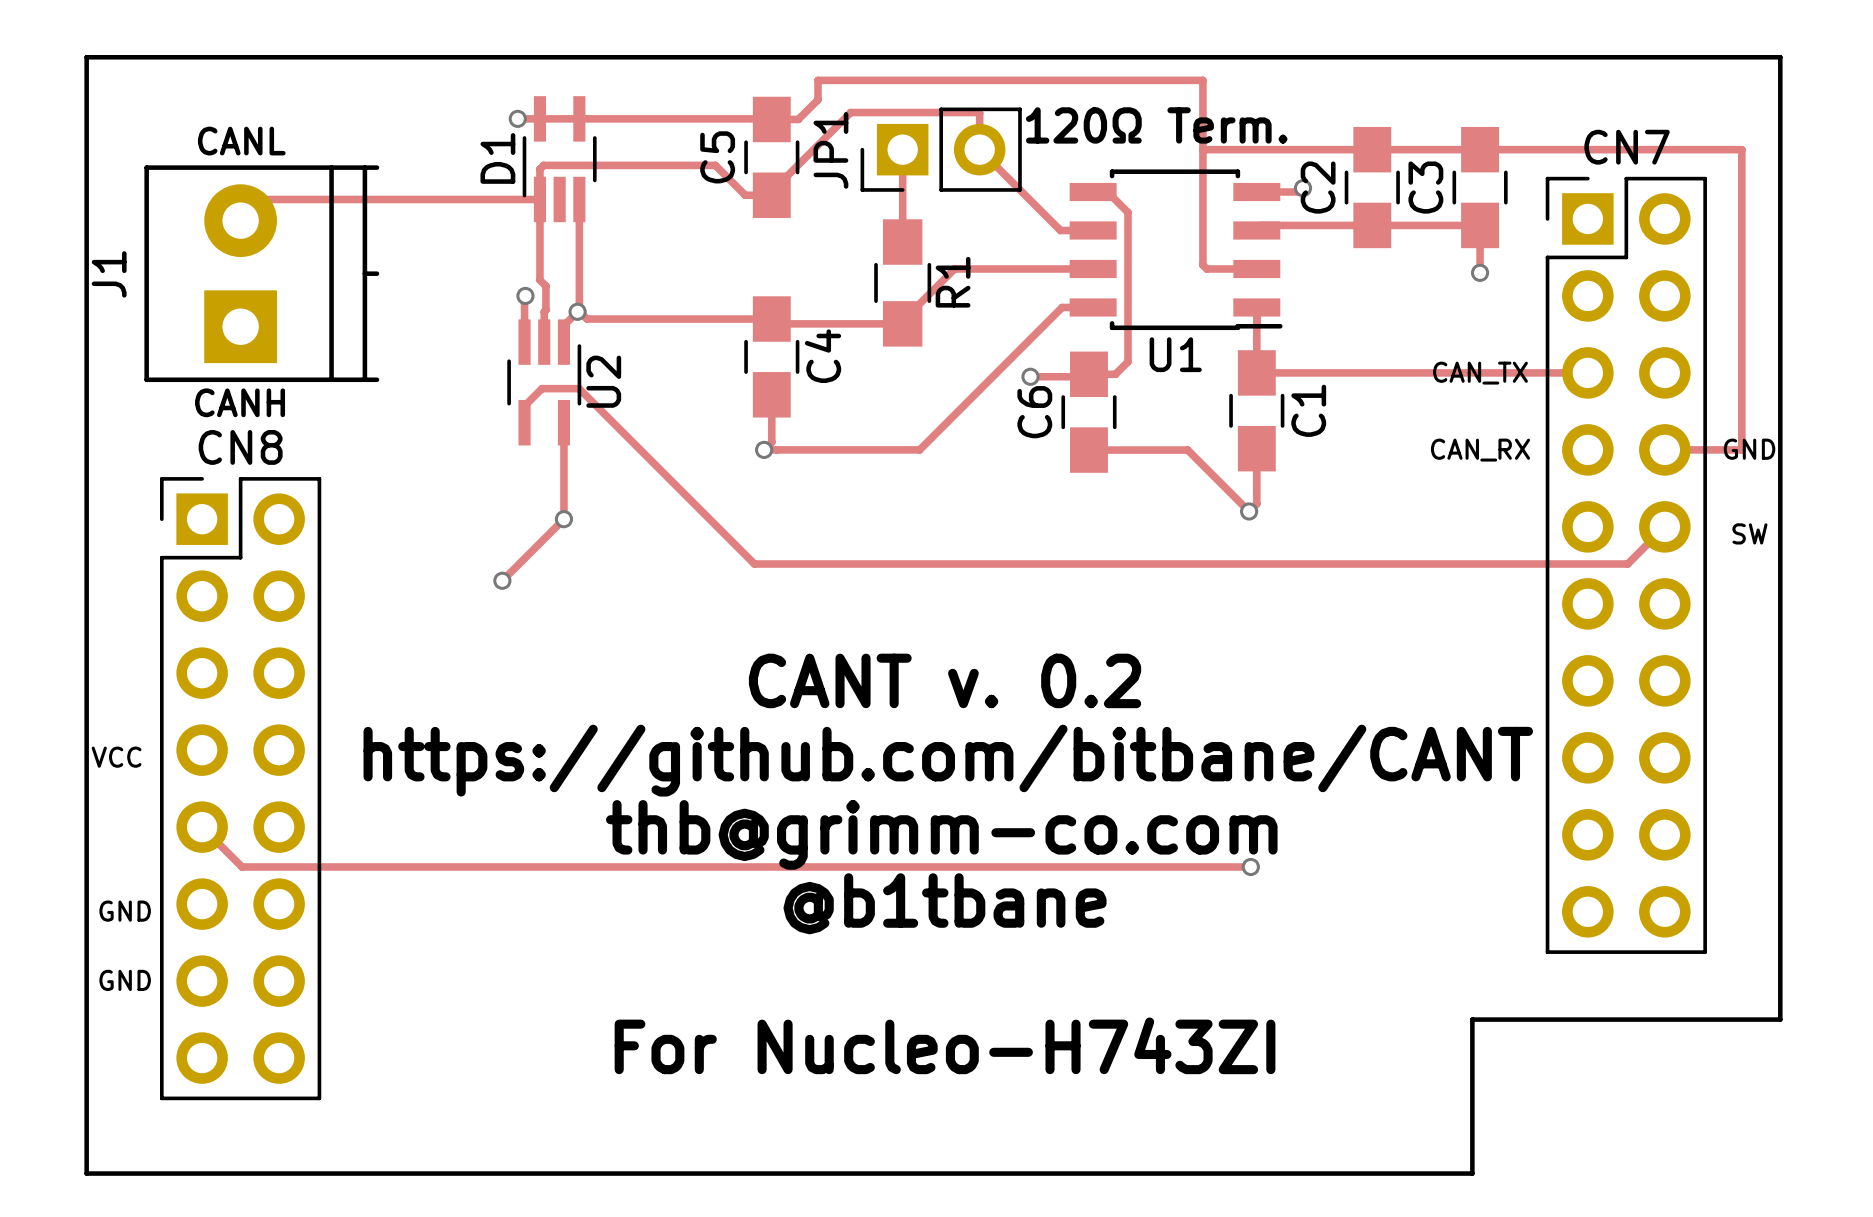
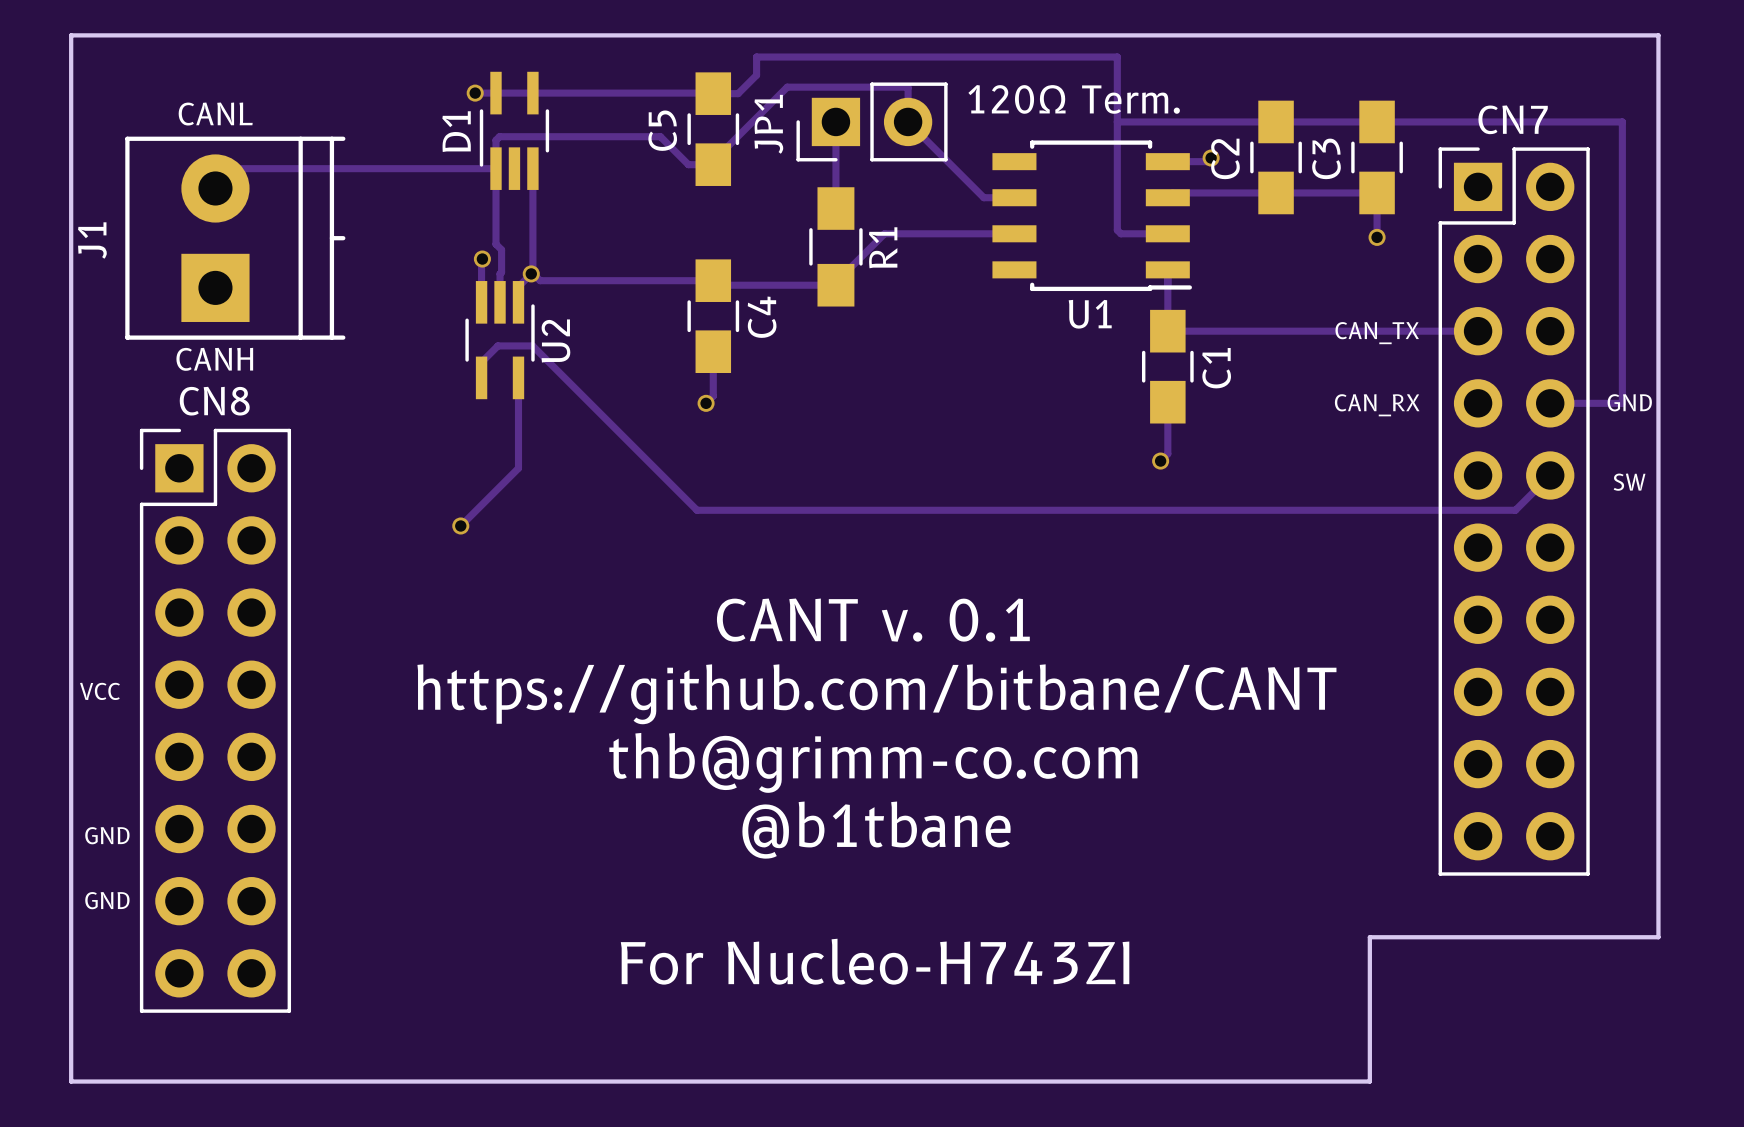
track: (1093, 192) (1107, 192) (1128, 212) (1128, 361) (1115, 374) (1088, 374) (1086, 376) (1030, 376) -> none
track: (1093, 307) (1062, 307) (919, 449) (764, 449) -> none
via: (1030, 376) -> none
C6: (1088, 412) -> none
track: (1088, 450) (1187, 450) (1249, 511) -> none
via: (563, 519) -> none
text: CANT v. 0.2 (945, 680) -> CANT v. 0.1 (873, 620)
track: (202, 827) (241, 866) (1250, 866) -> none
via: (1250, 866) -> none

